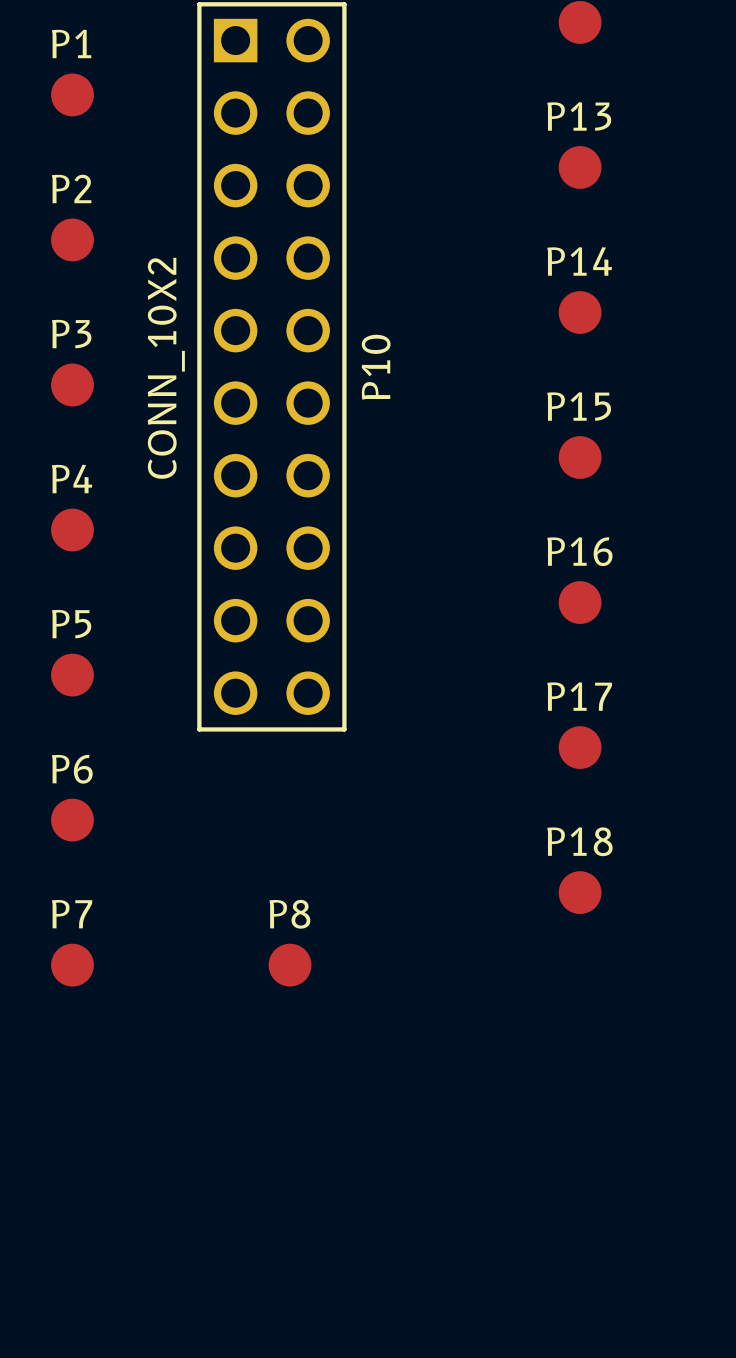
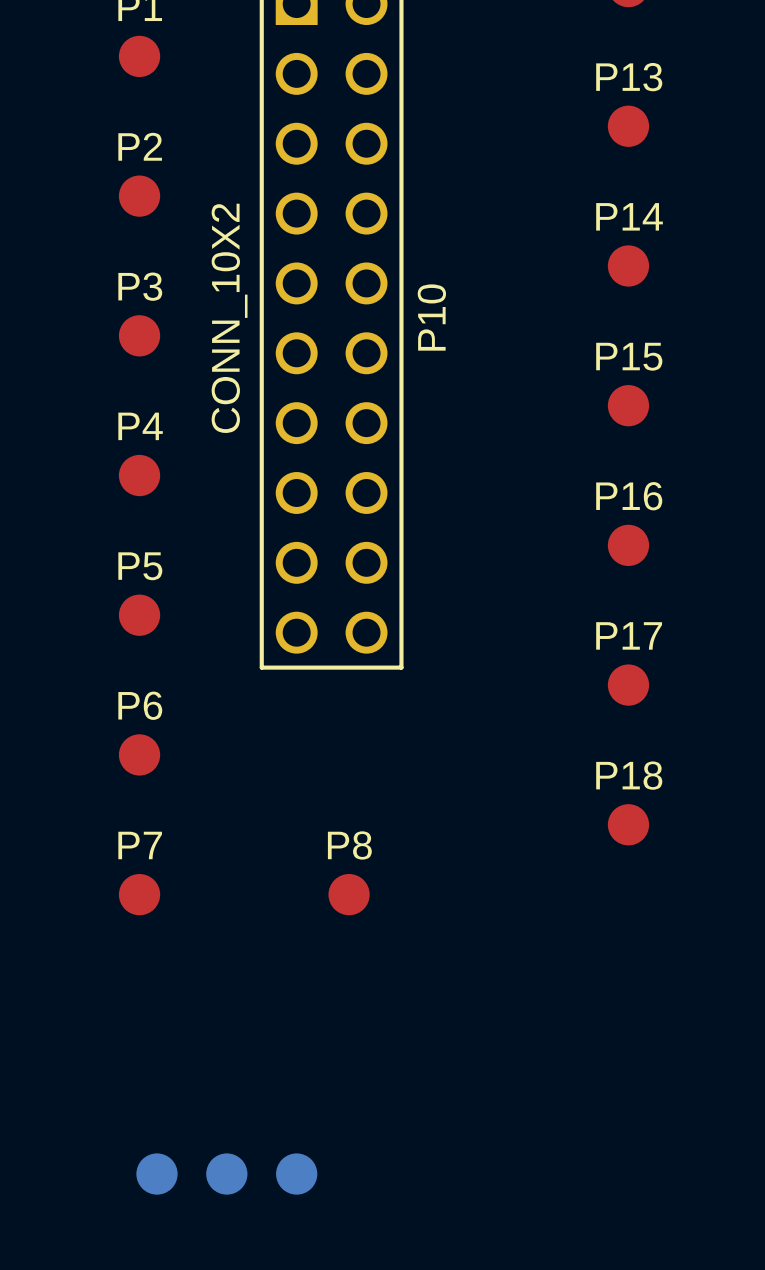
part: none -> (156, 1174)
part: none -> (226, 1174)
part: none -> (296, 1174)

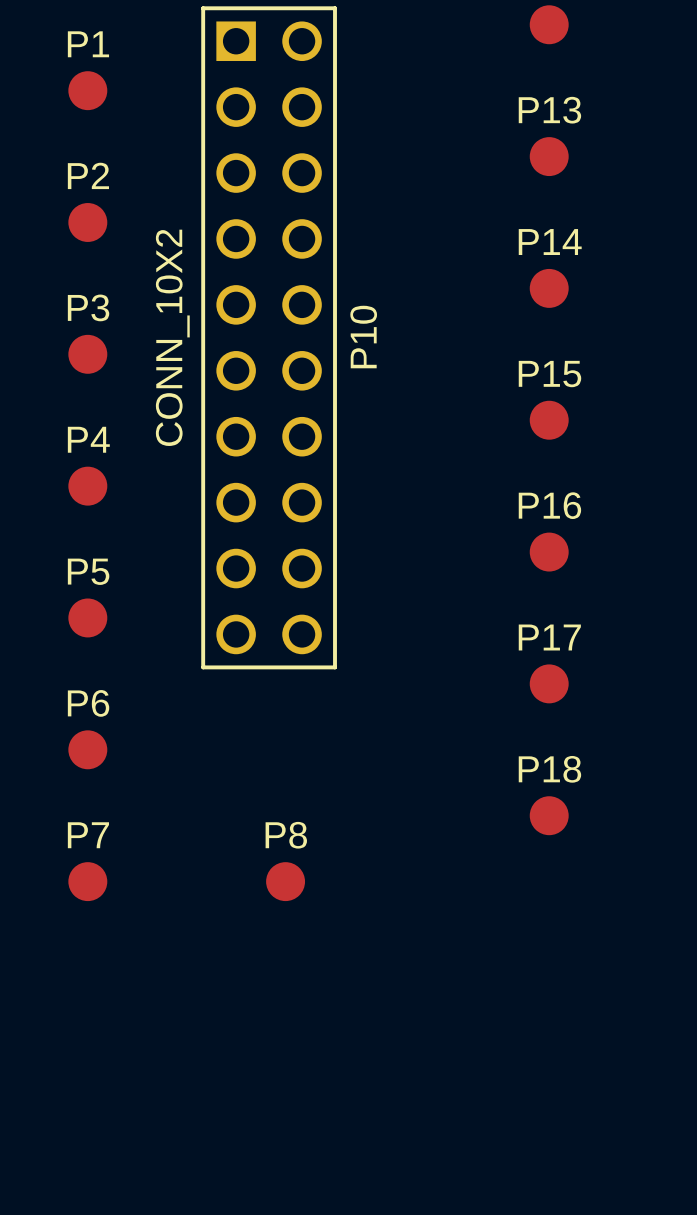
part: (156, 1174) -> none
part: (226, 1174) -> none
part: (296, 1174) -> none

